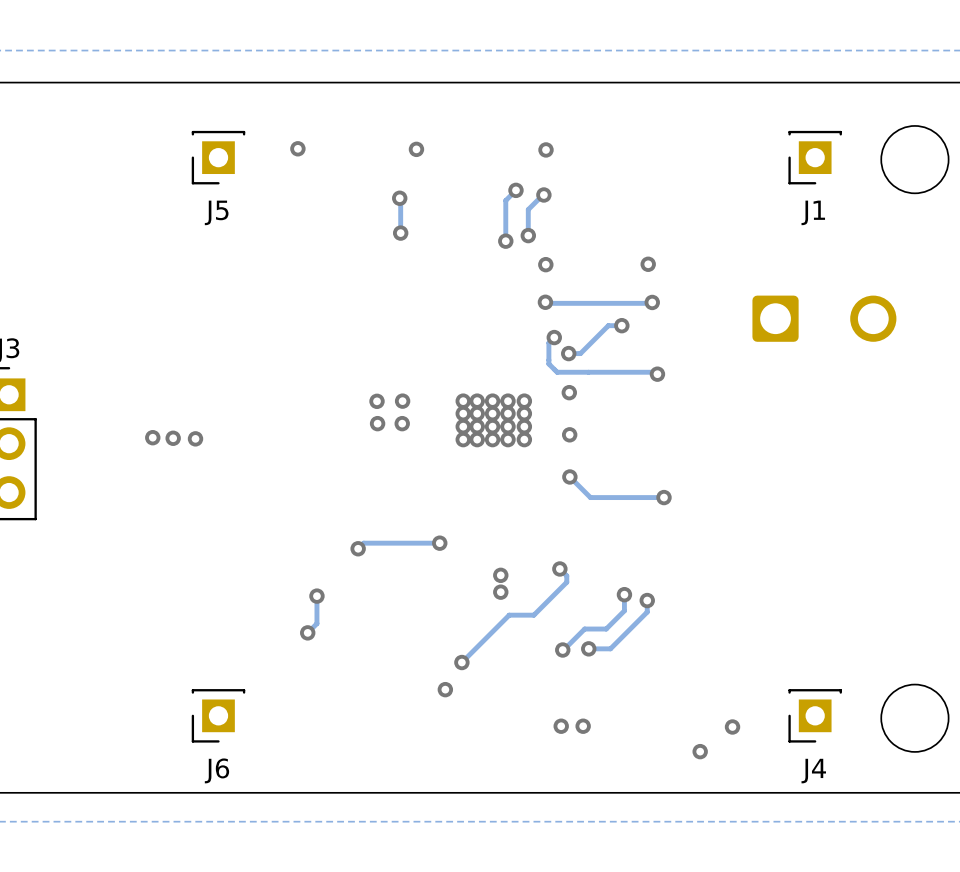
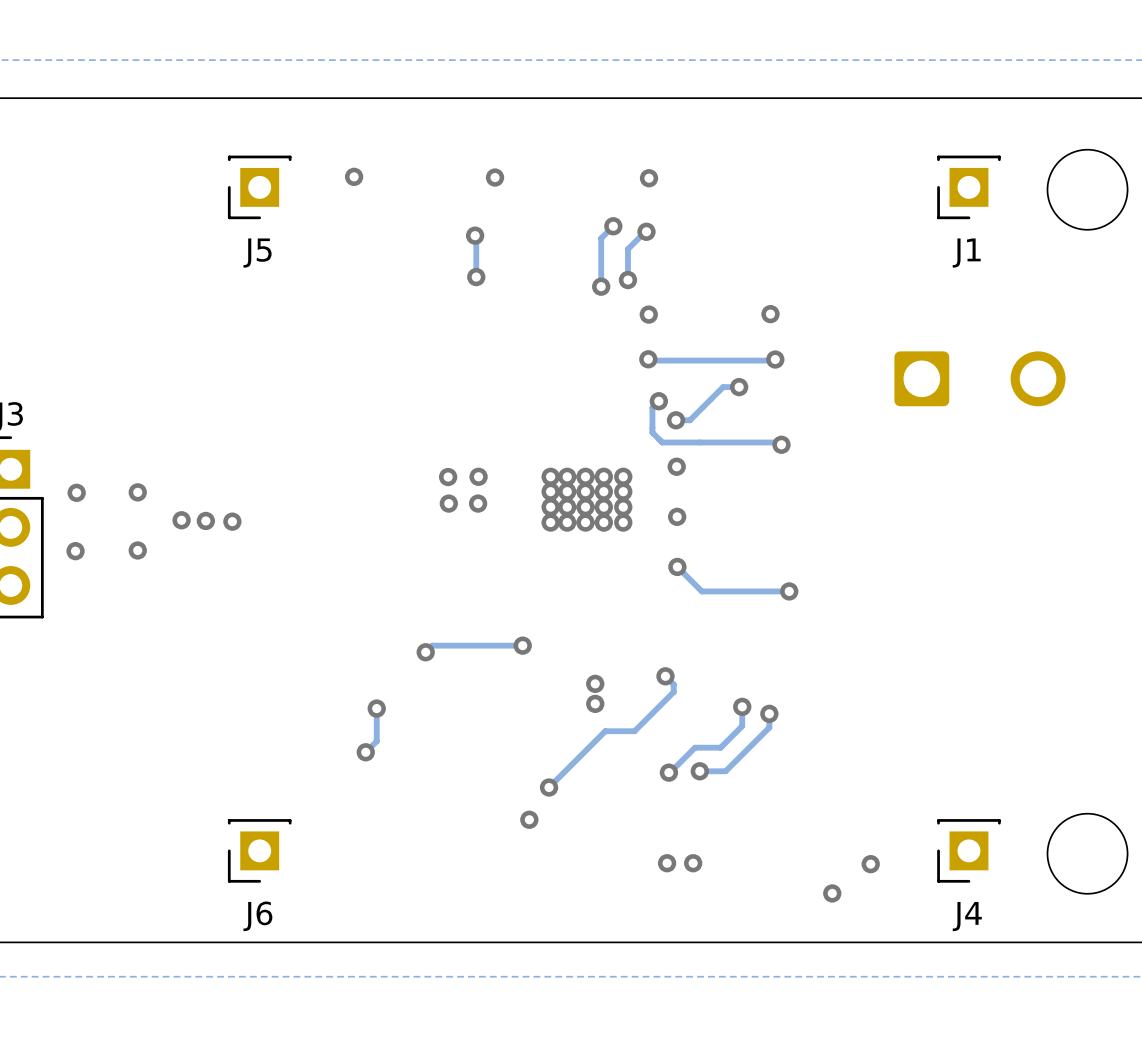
via: none -> (76, 492)
via: none -> (137, 492)
via: none -> (75, 551)
via: none -> (137, 550)

